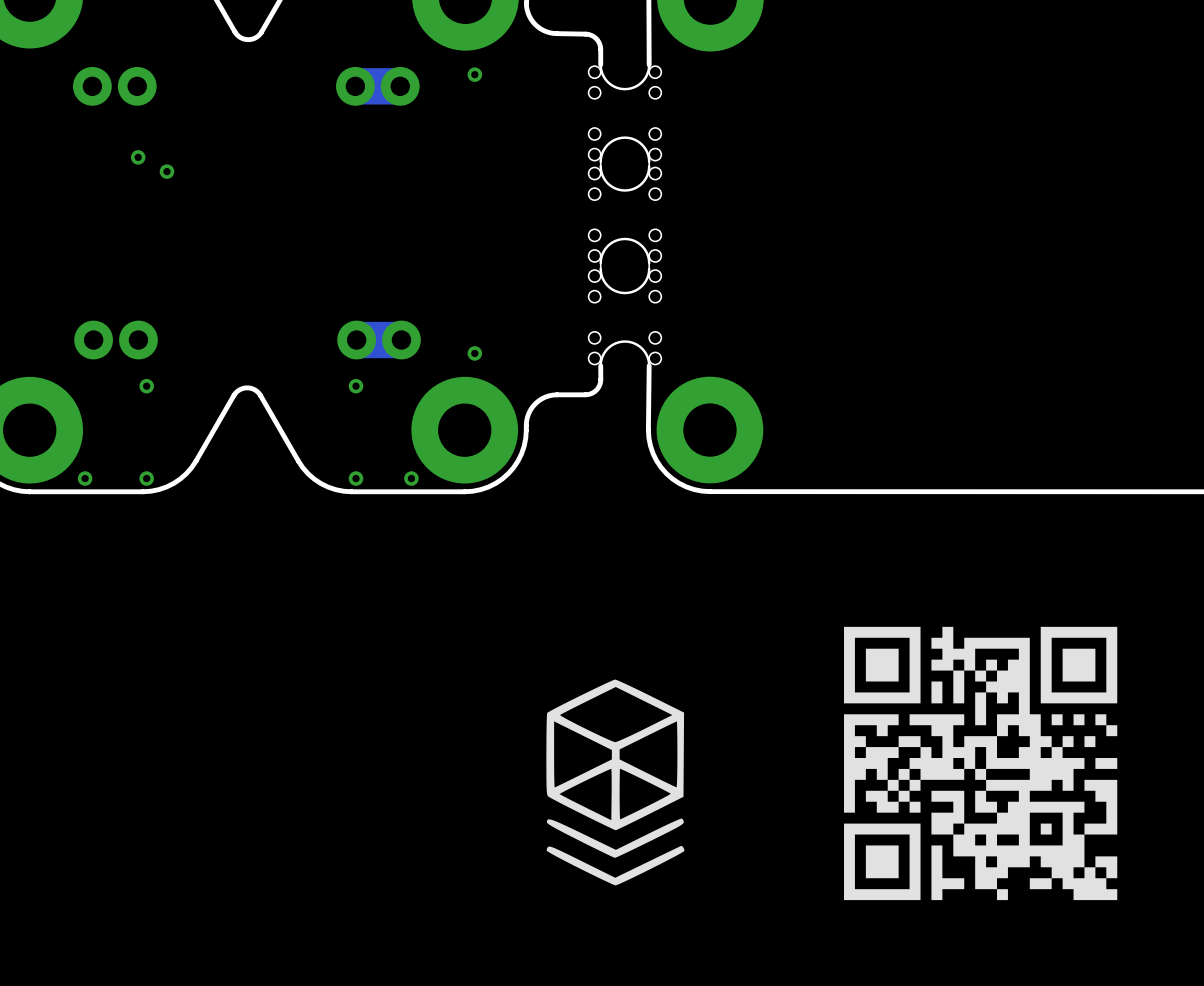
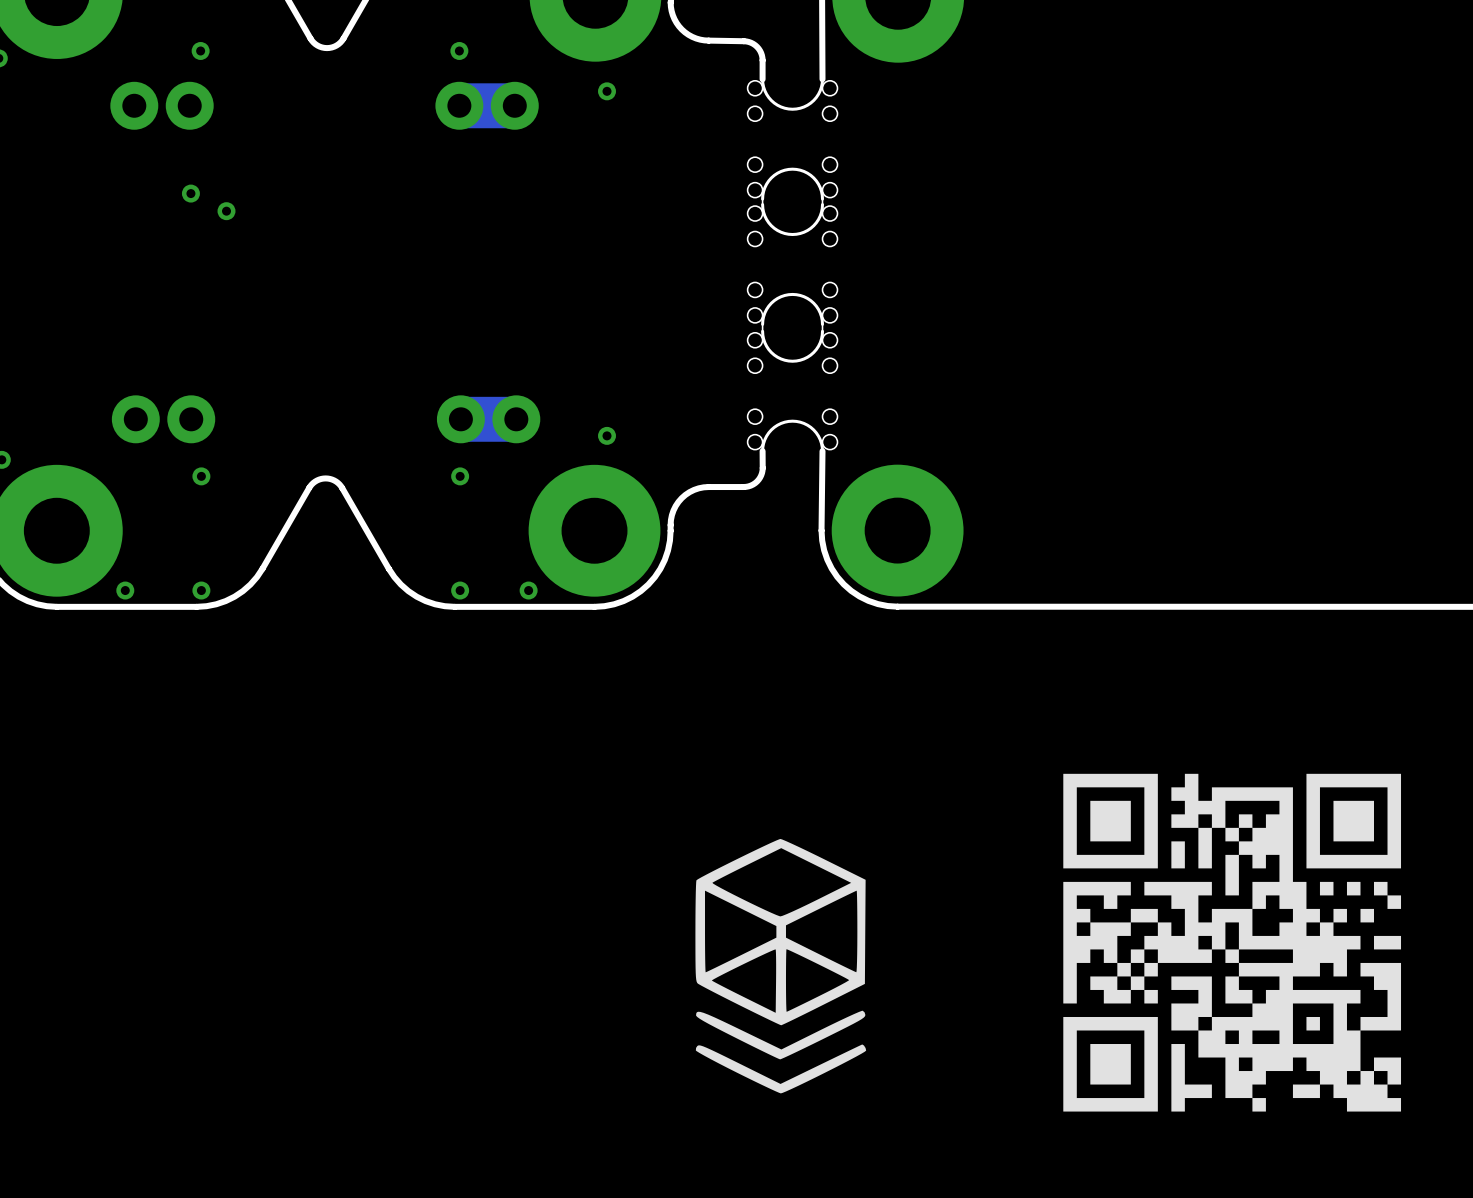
via: none -> (200, 50)
via: none -> (459, 50)

